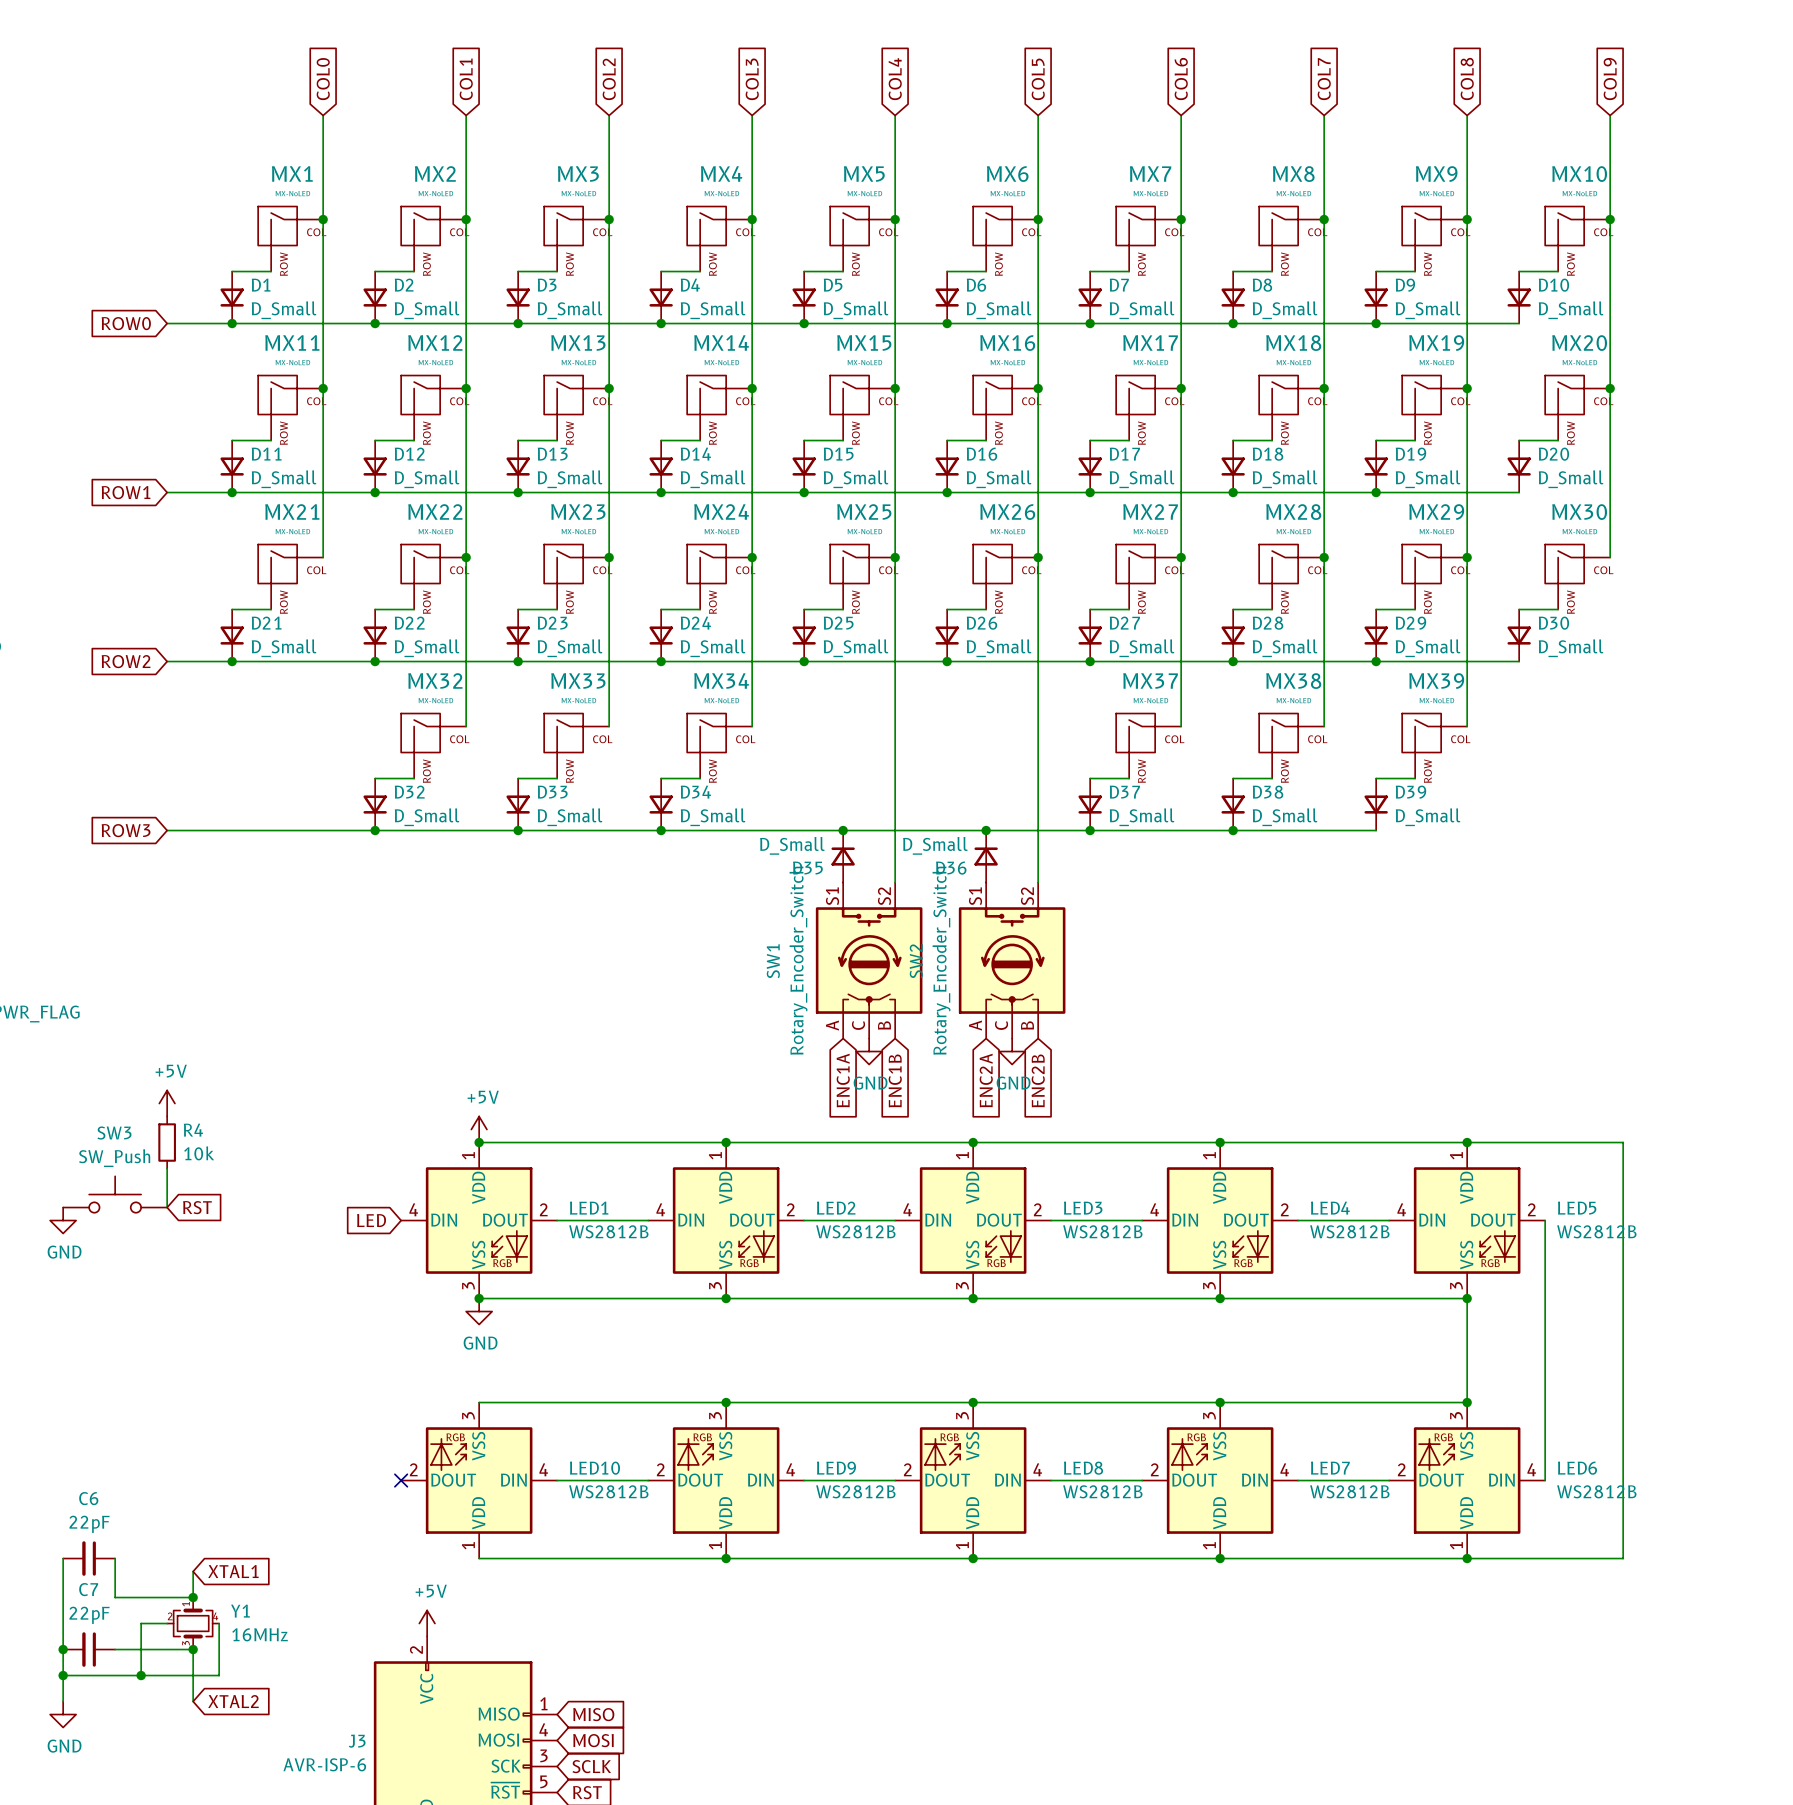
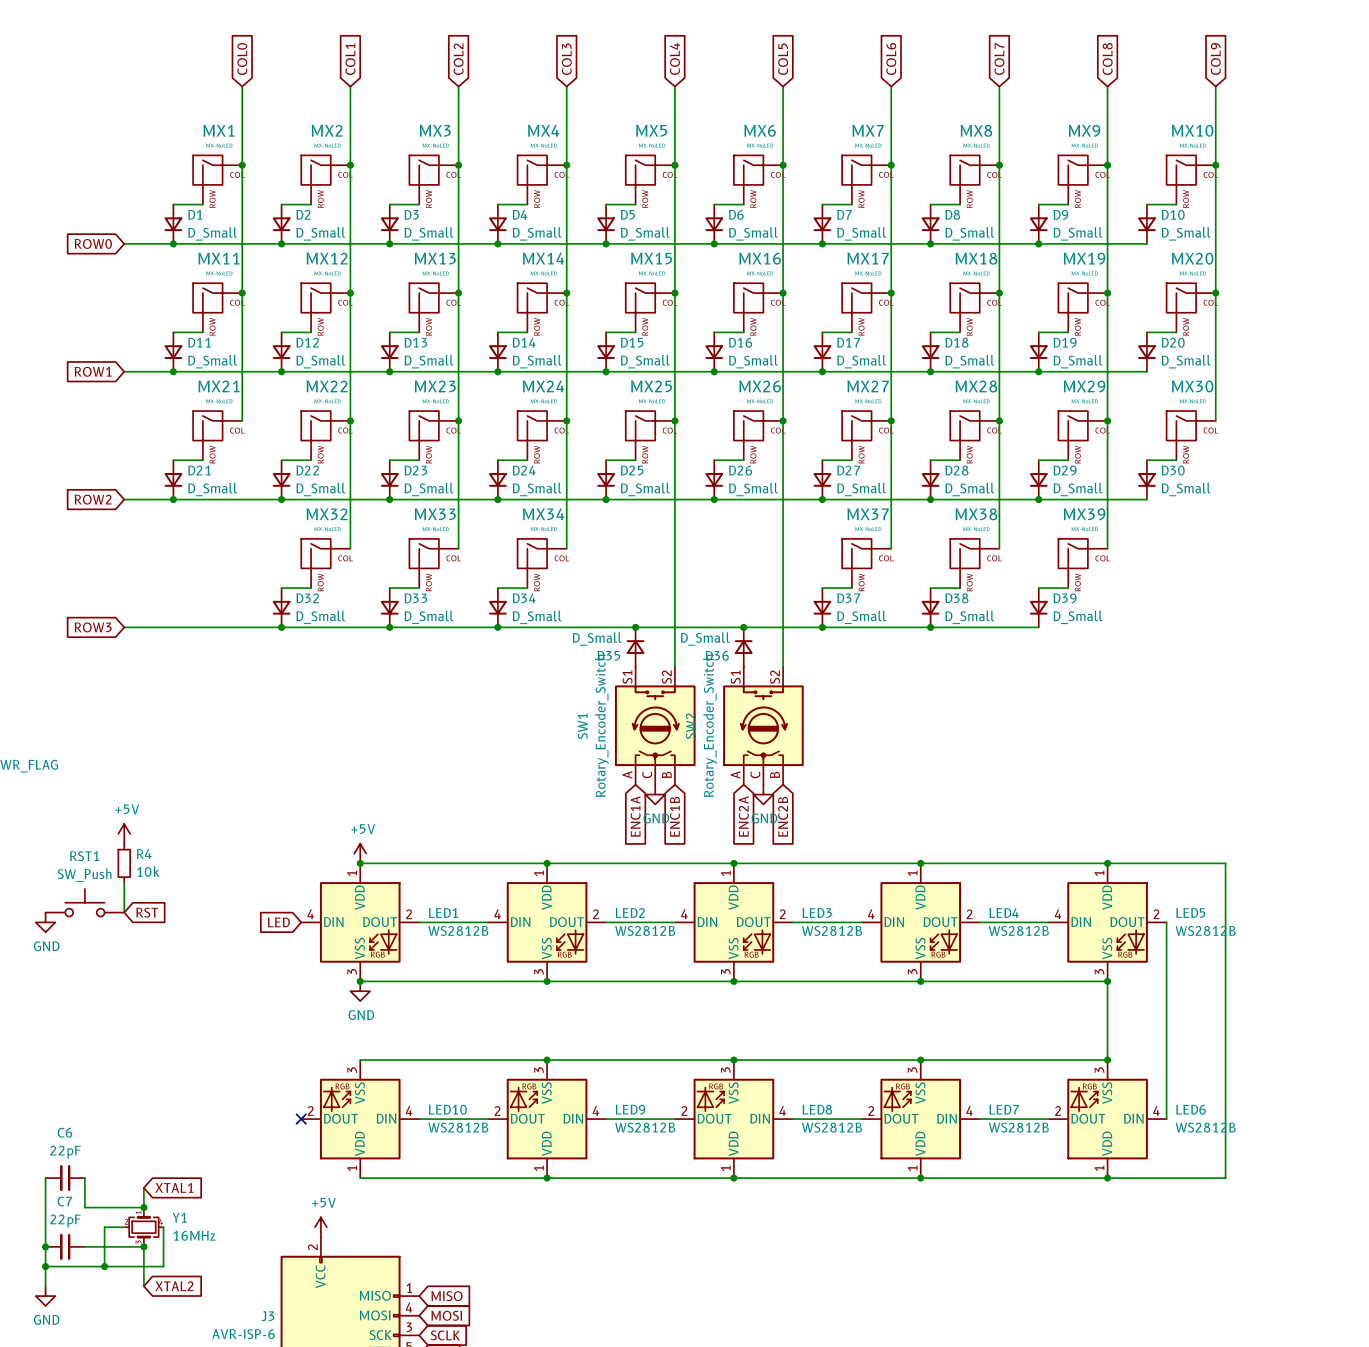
SW3 name: SW3 (114, 1133) -> RST1 (84, 856)

